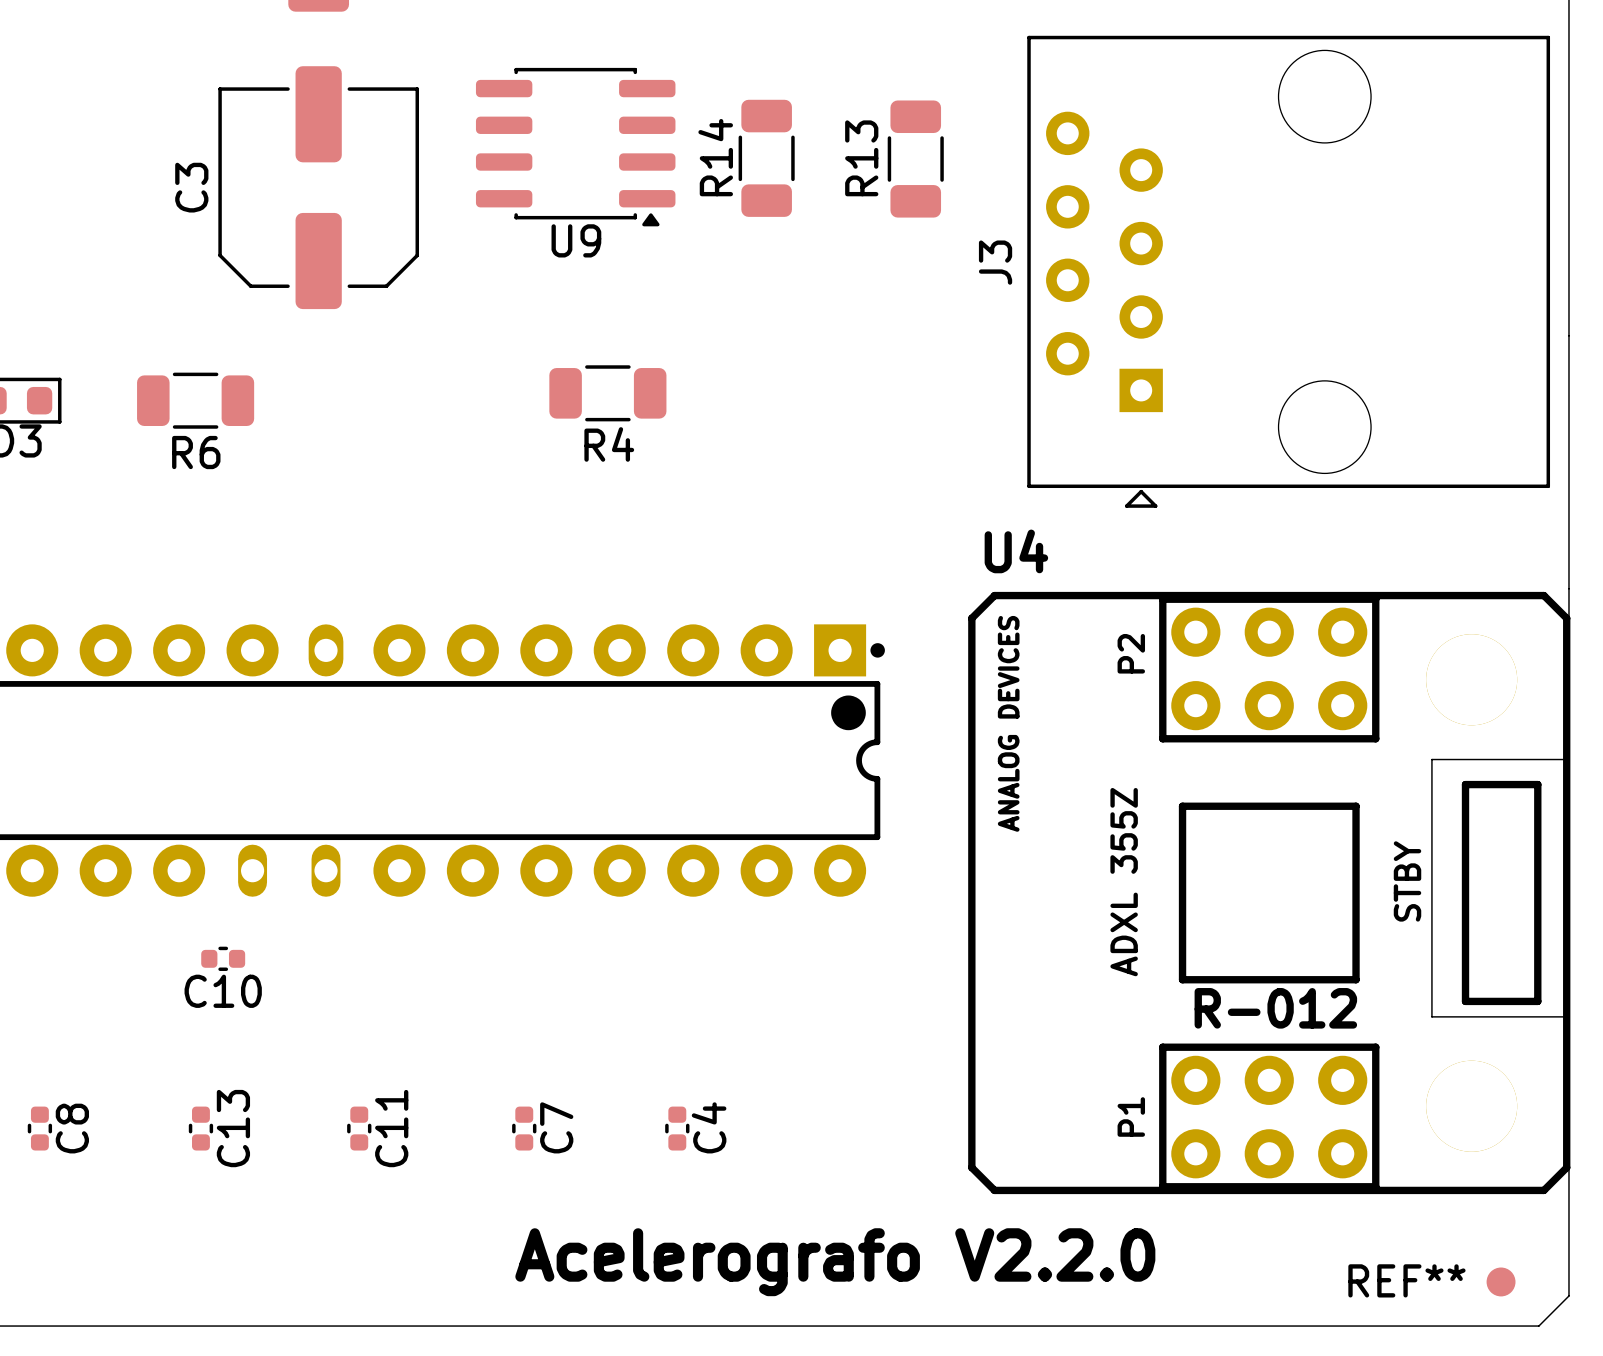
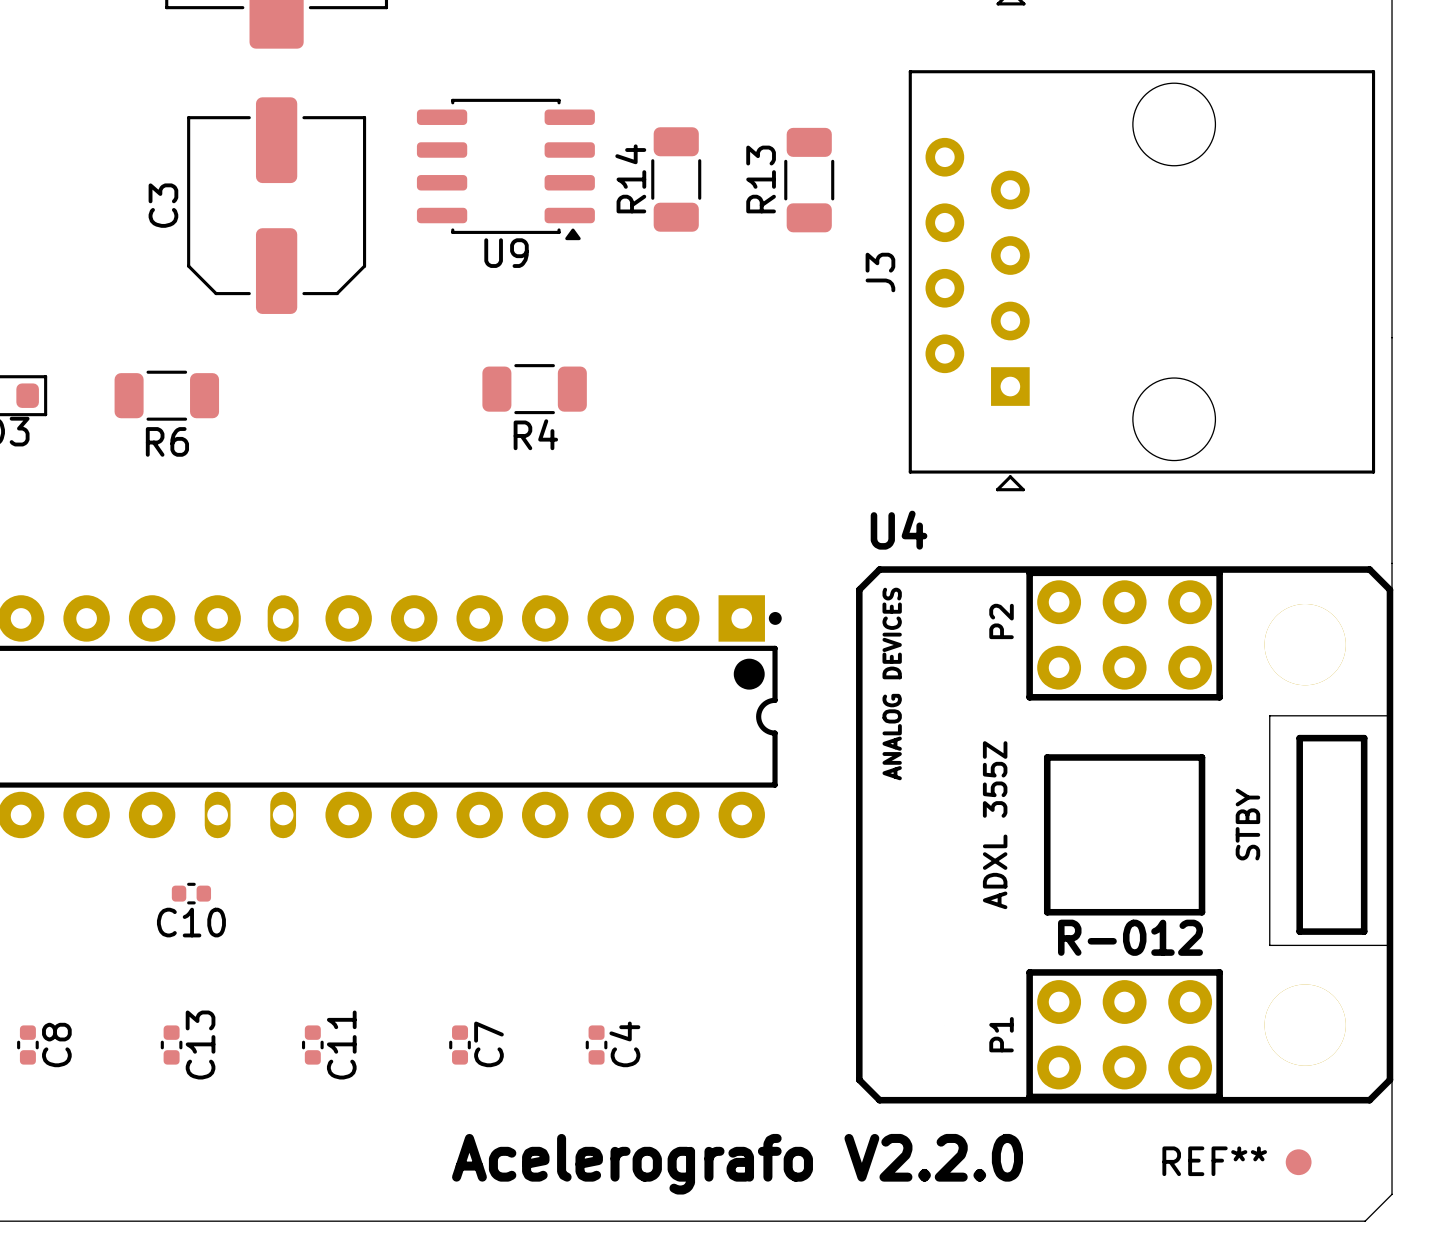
REF** position: (1501, 1281) -> (1298, 1162)

